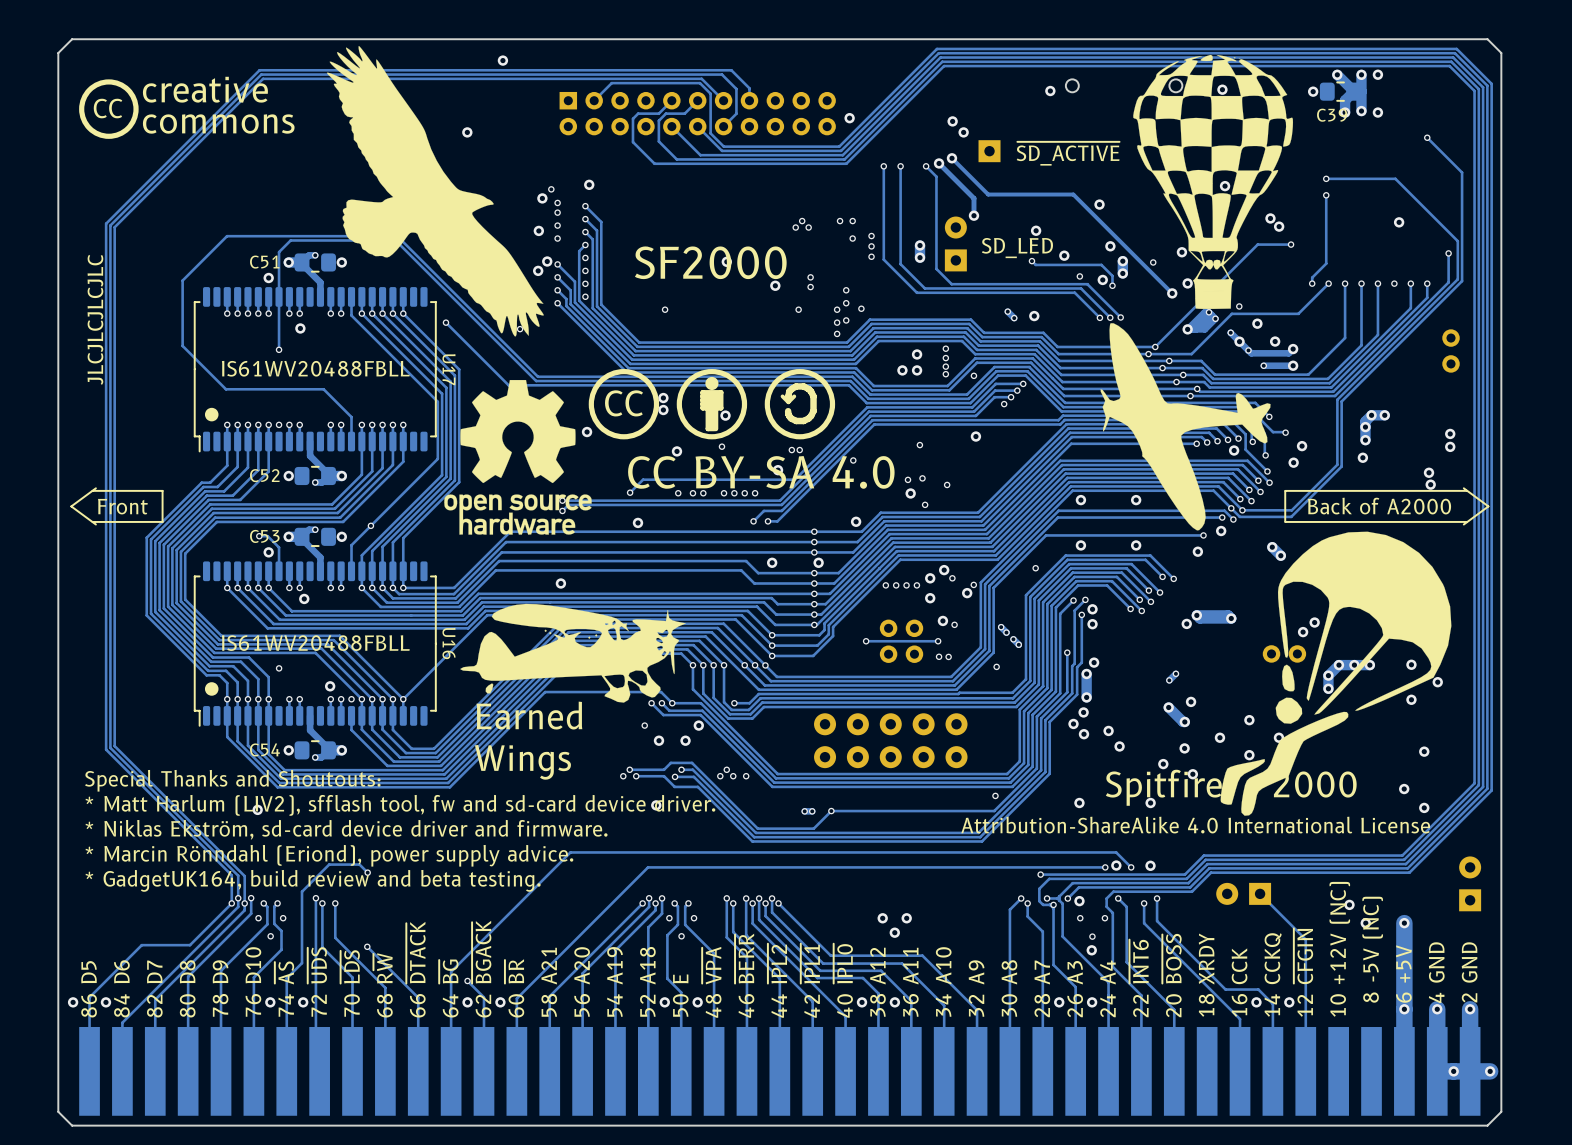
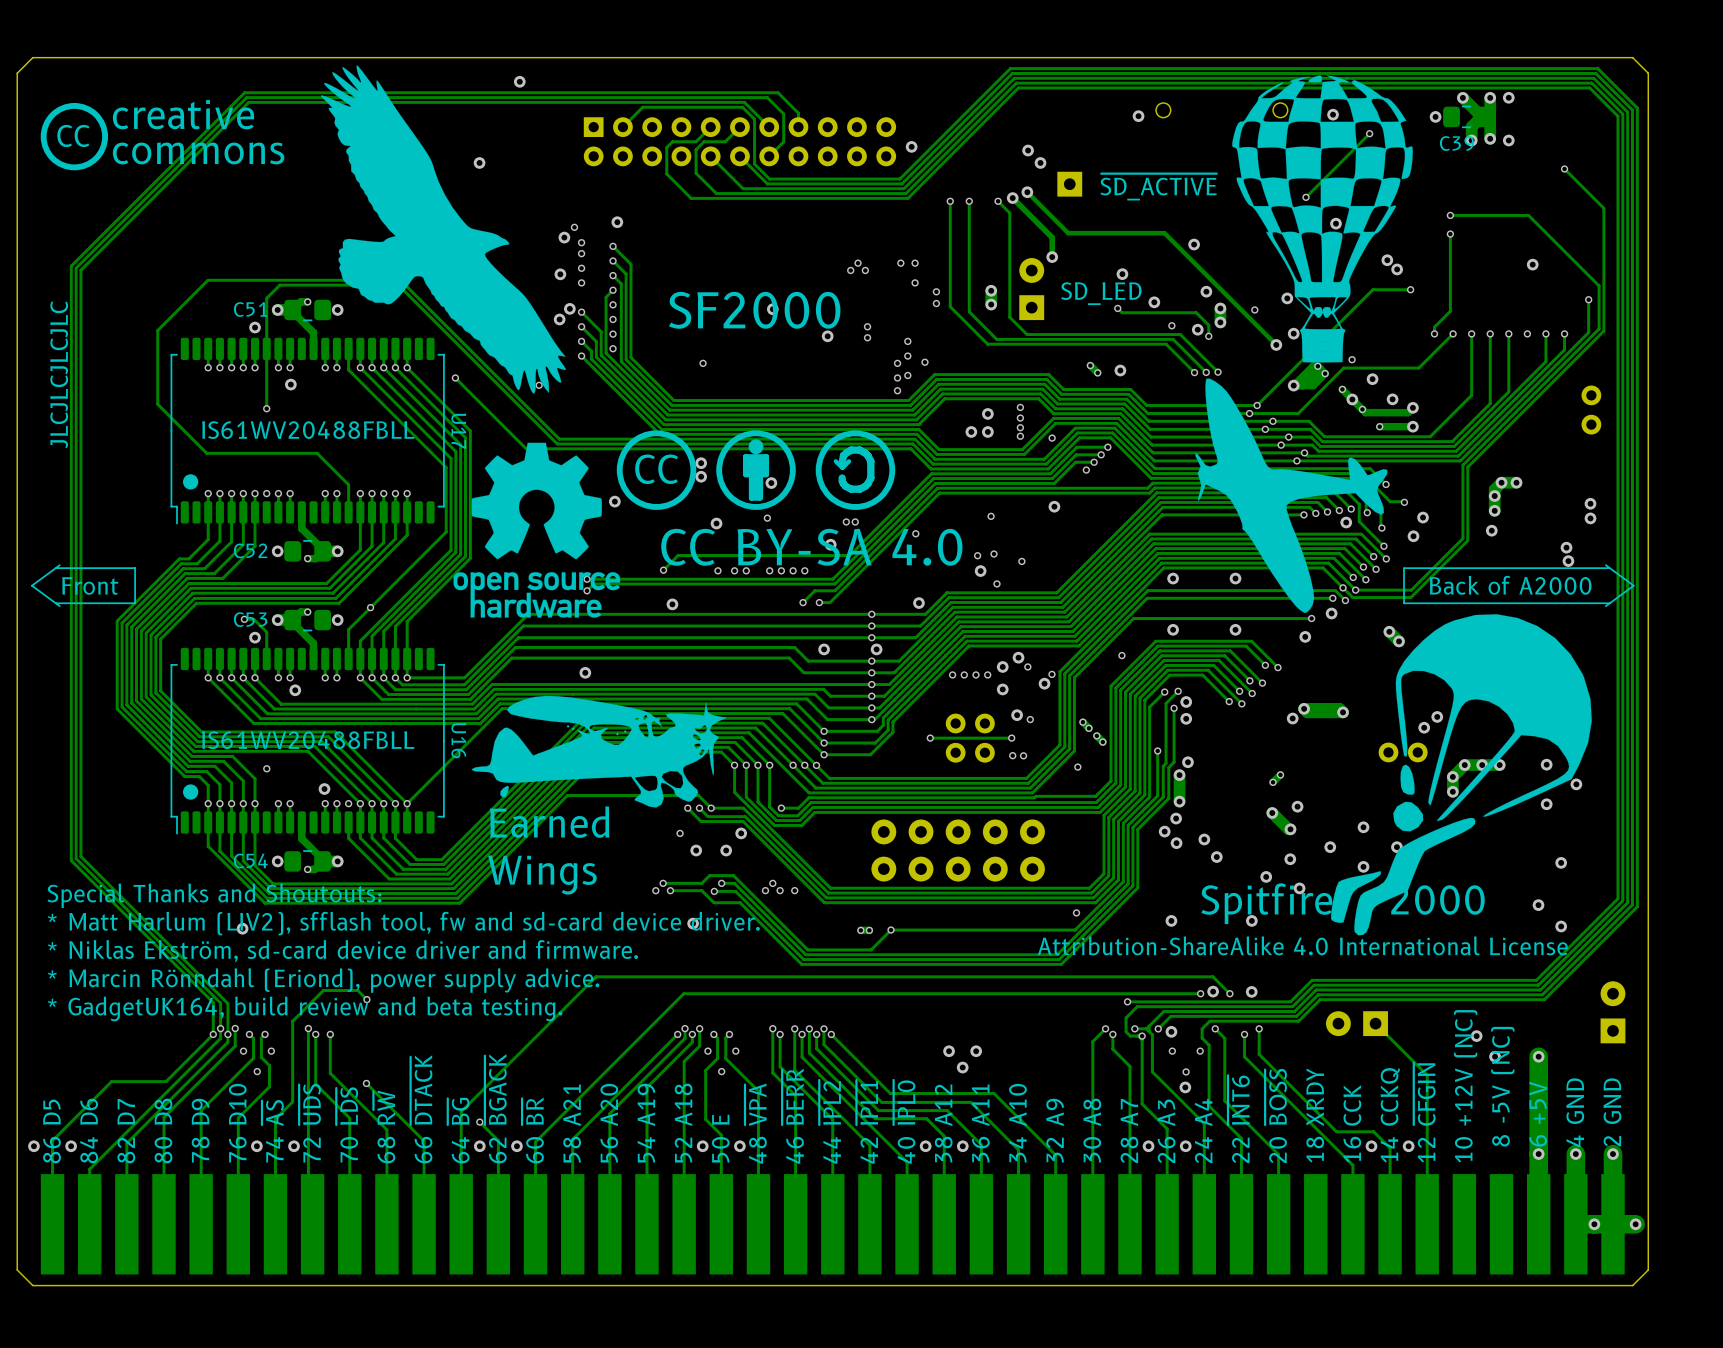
track: none -> (1369, 133) (1306, 197)
via: none -> (1369, 133)
via: none -> (1306, 197)
via: (871, 236) -> none
via: (798, 309) -> none

